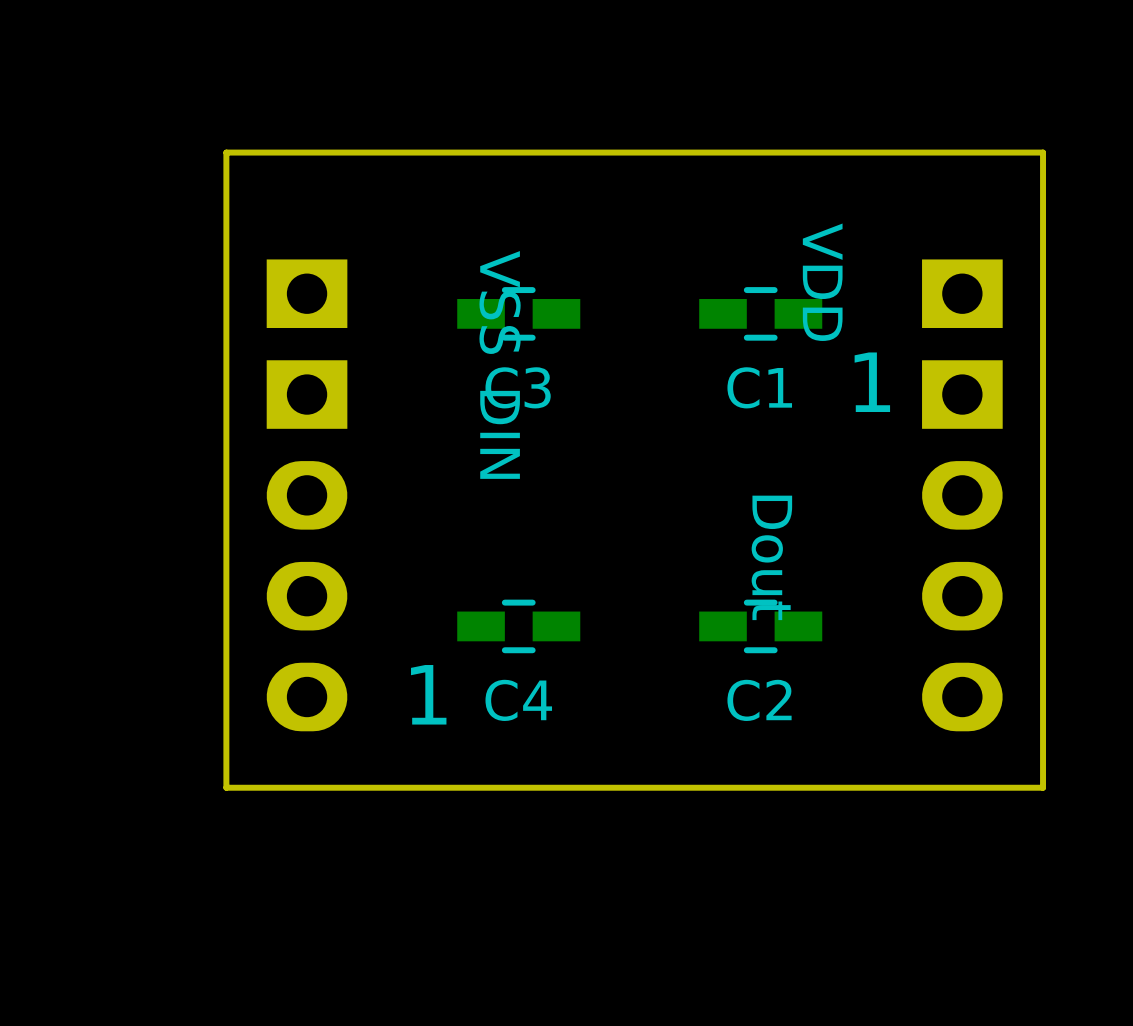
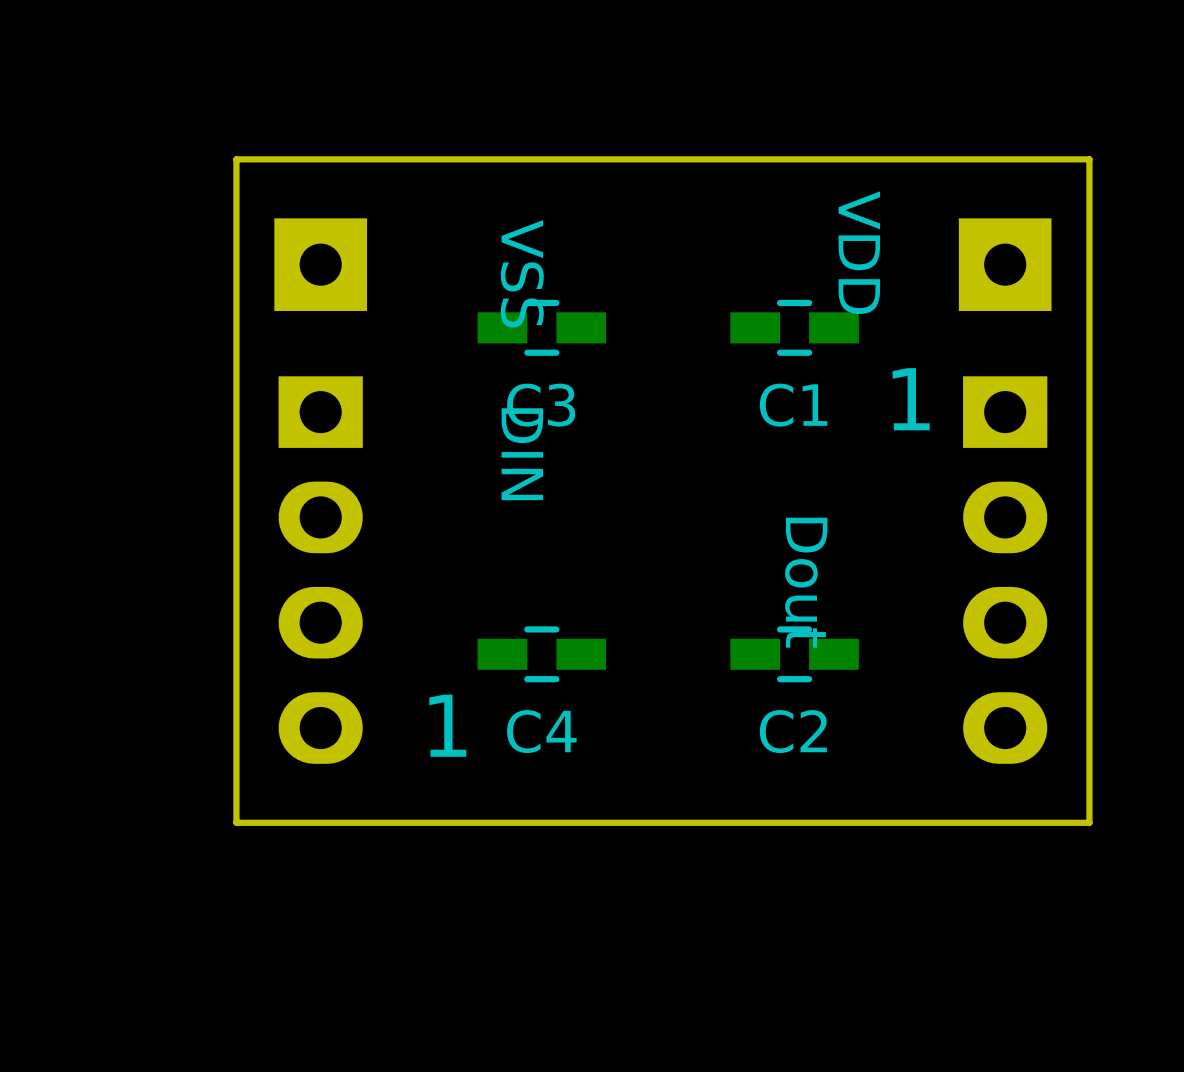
VSS: none -> (320, 264)
VDD: none -> (1005, 264)
VSS: (307, 293) -> none
VDD: (962, 293) -> none

